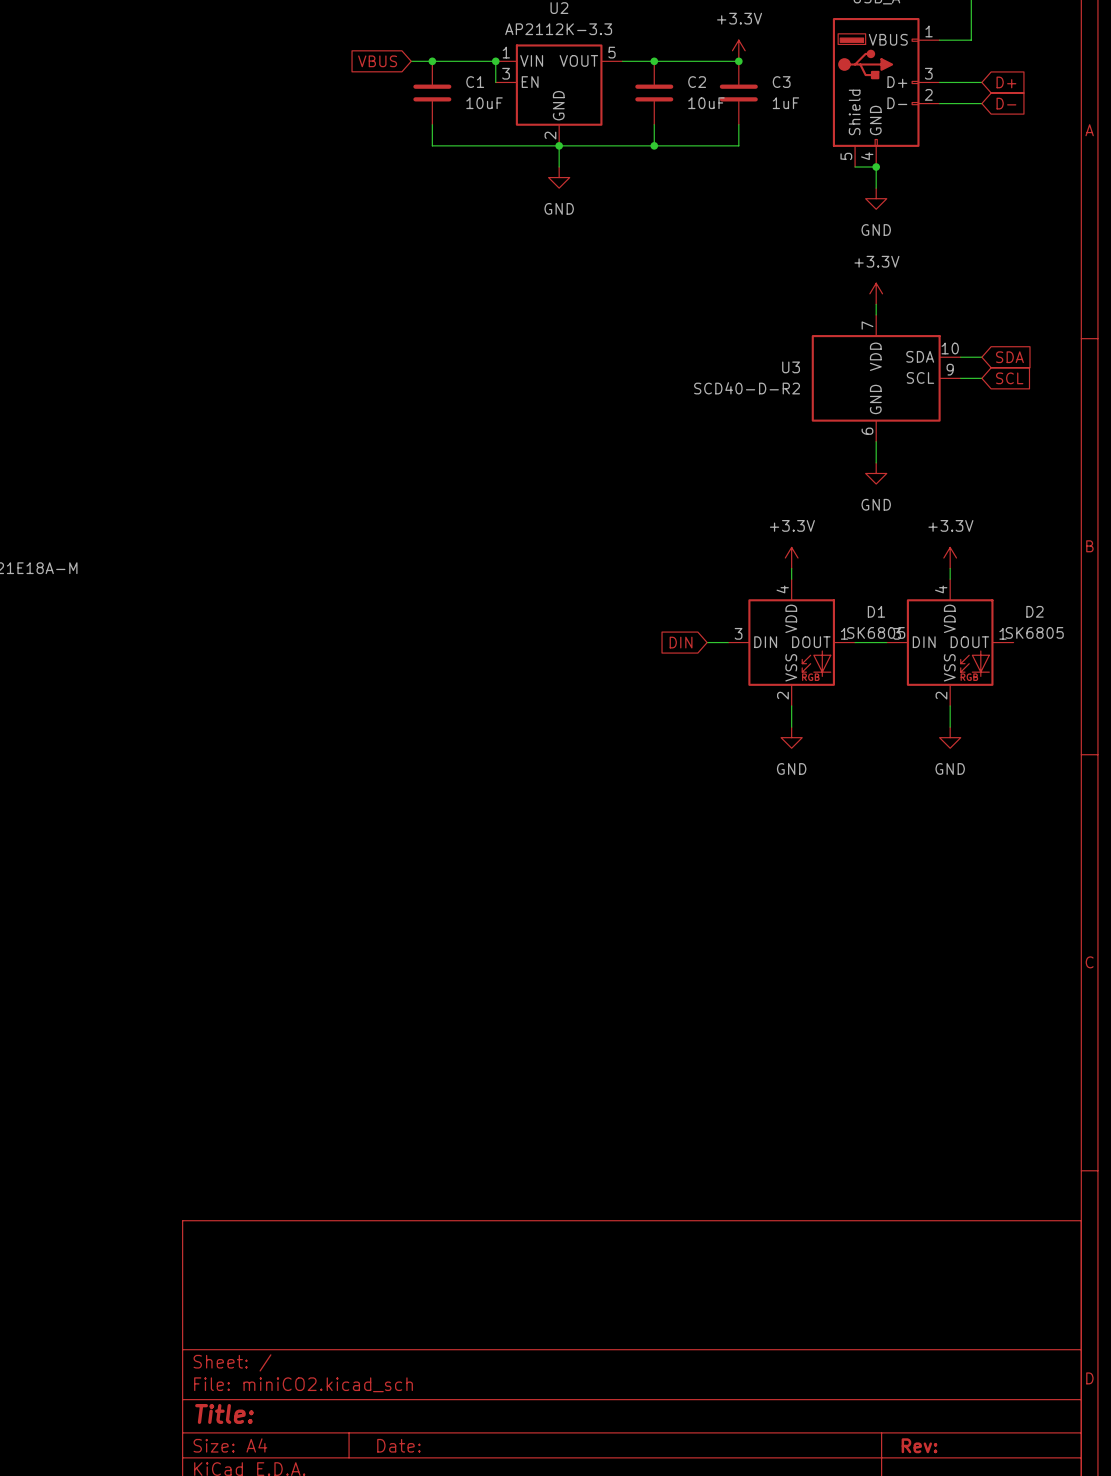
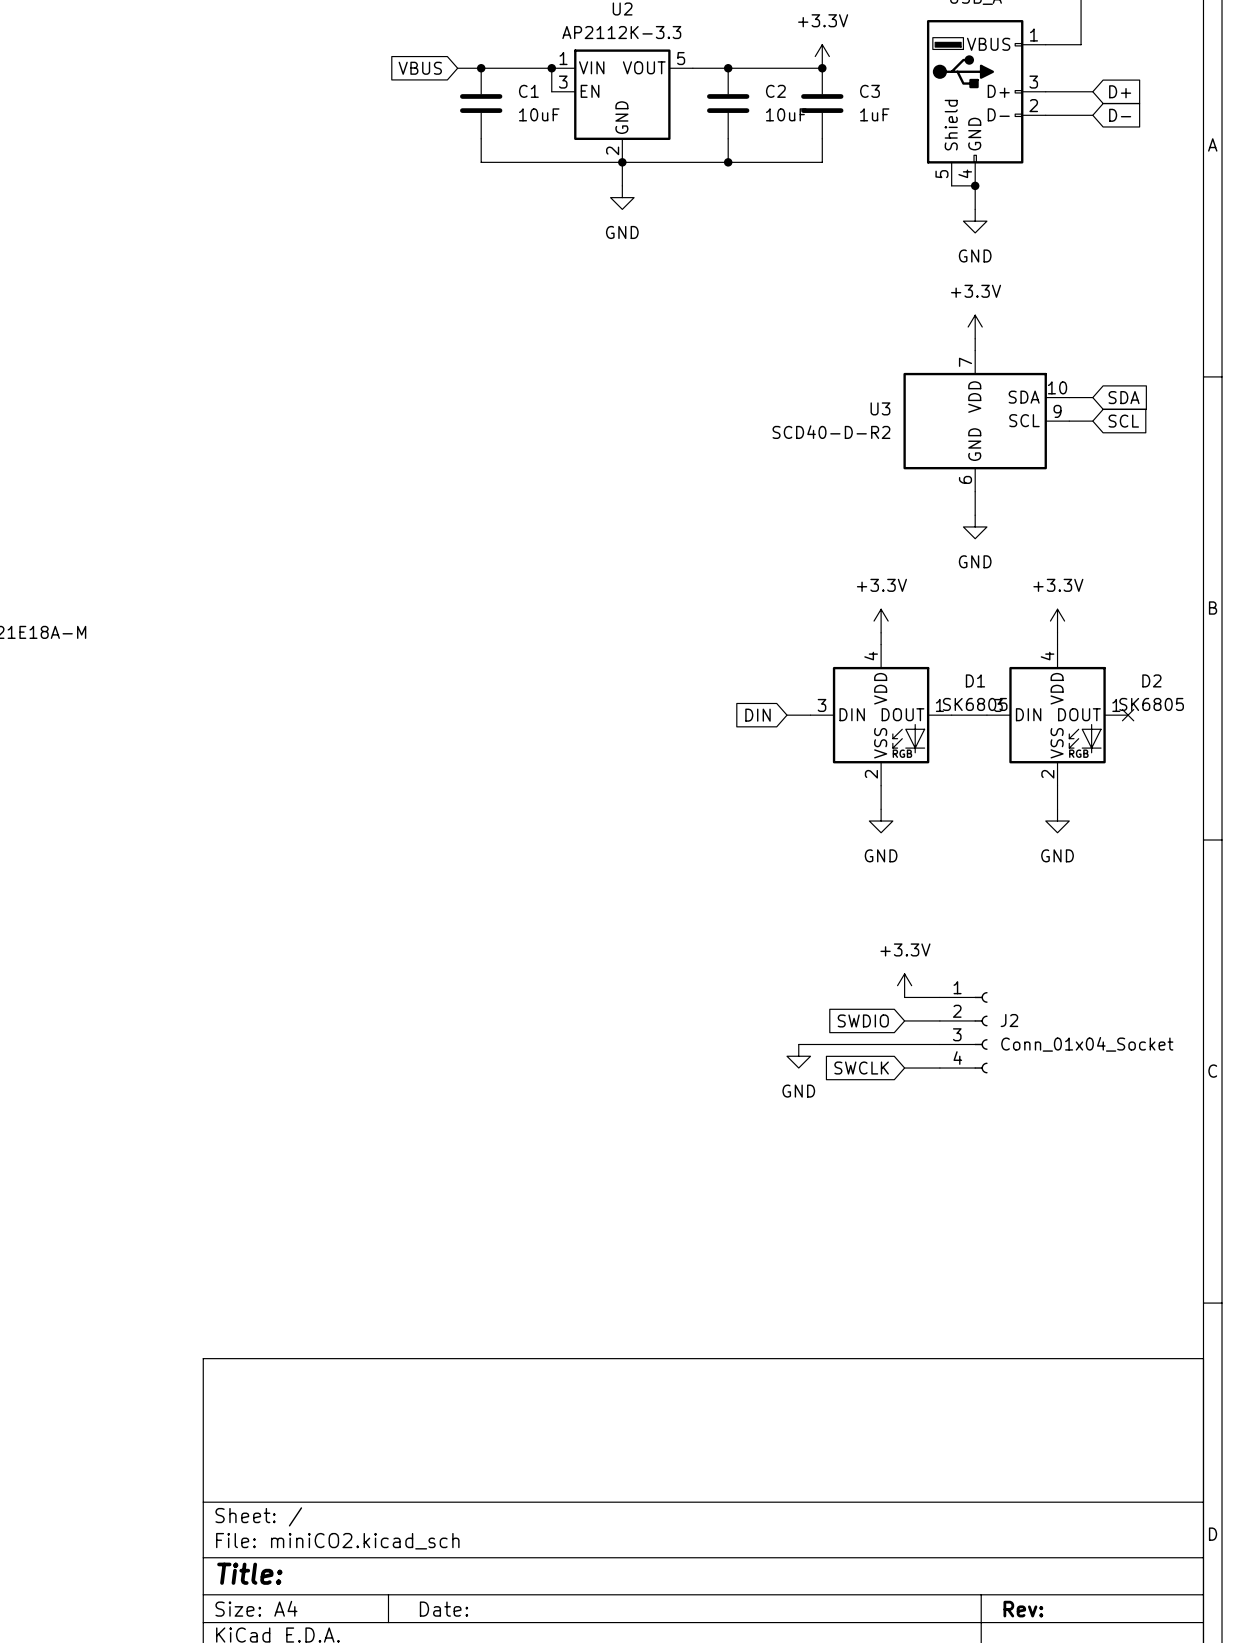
no-connect mark: none -> (1128, 715)
power symbol: none -> +3.3V (904, 985)
wire: none -> (904, 997) (939, 997)
global label: none -> SWDIO (863, 1020)
wire: none -> (904, 1020) (939, 1020)
J2: none -> Conn_01x04_Socket (963, 1032)
wire: none -> (798, 1044) (939, 1044)
power symbol: none -> GND (798, 1056)
global label: none -> SWCLK (861, 1068)
wire: none -> (904, 1068) (939, 1068)

